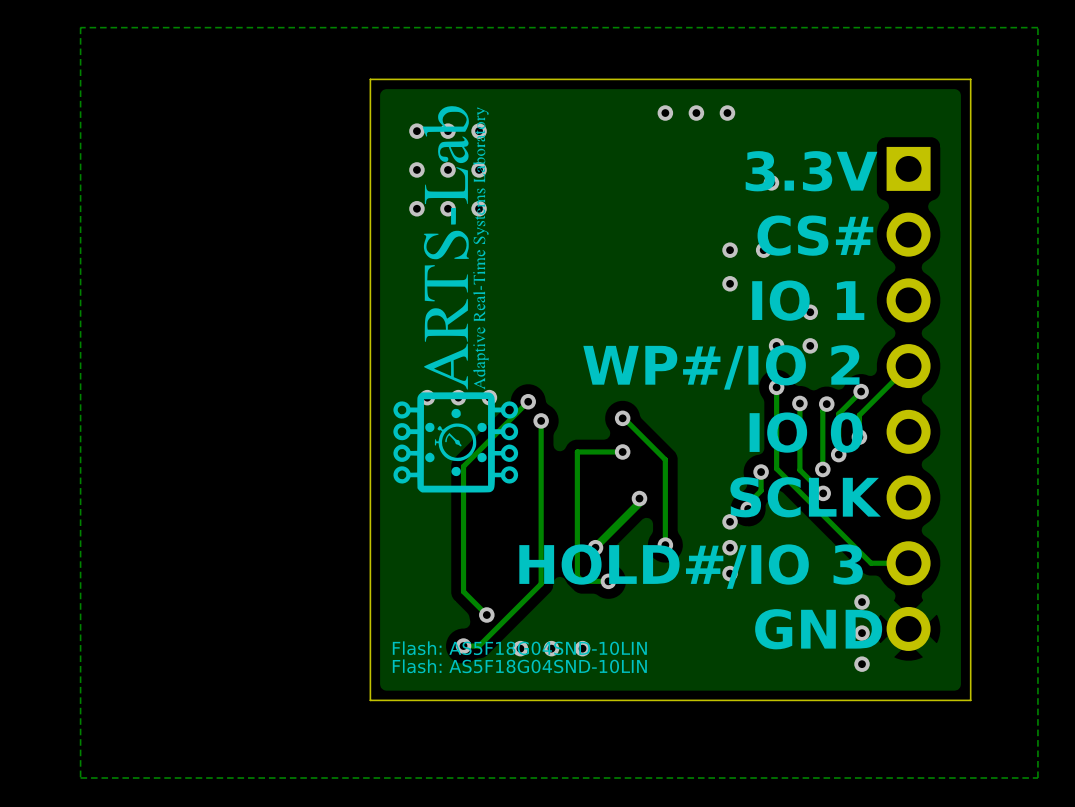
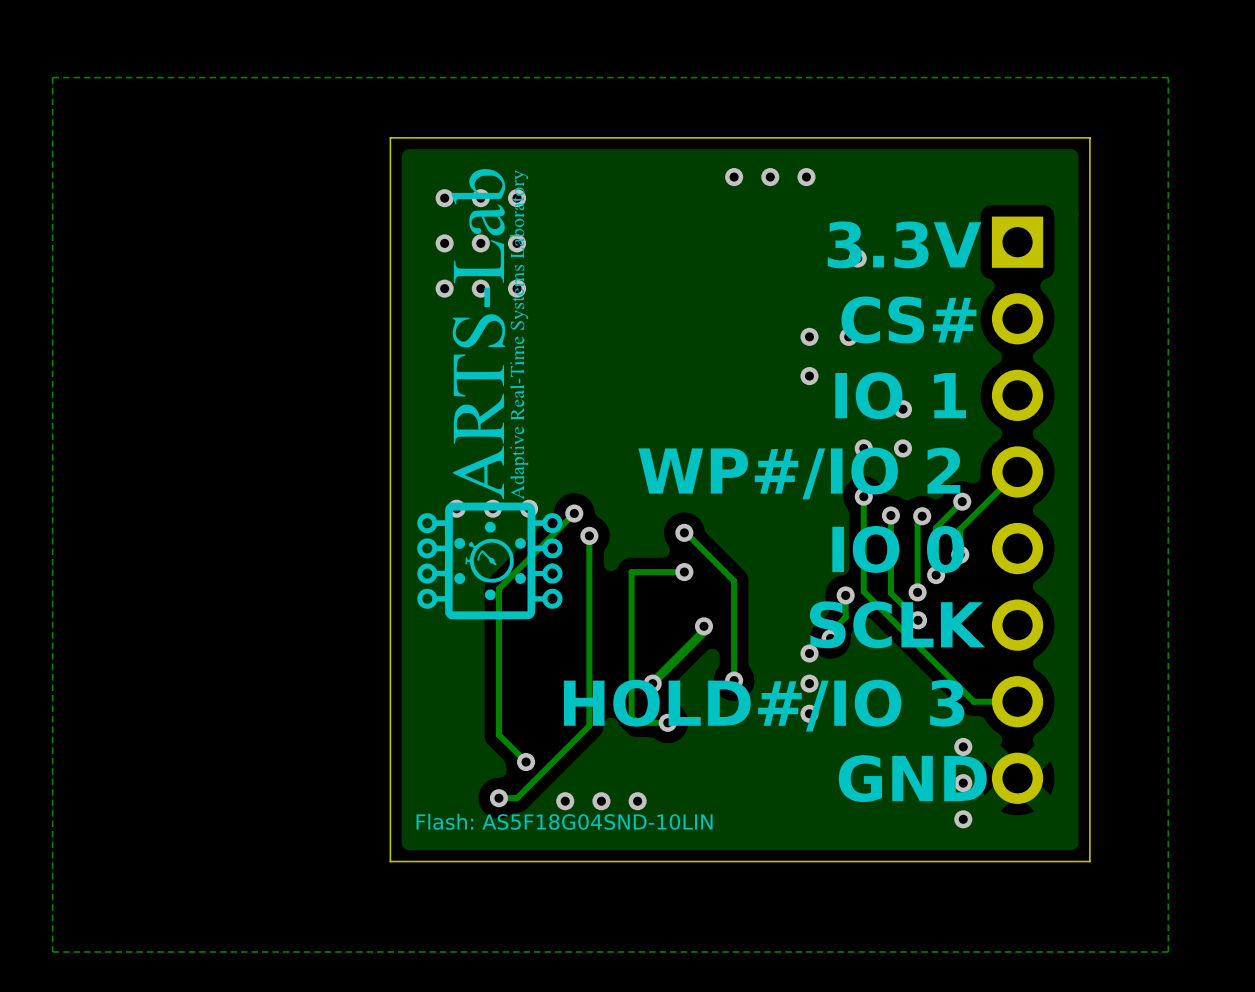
text: Flash: AS5F18G04SND-10LIN (519, 648) -> none

